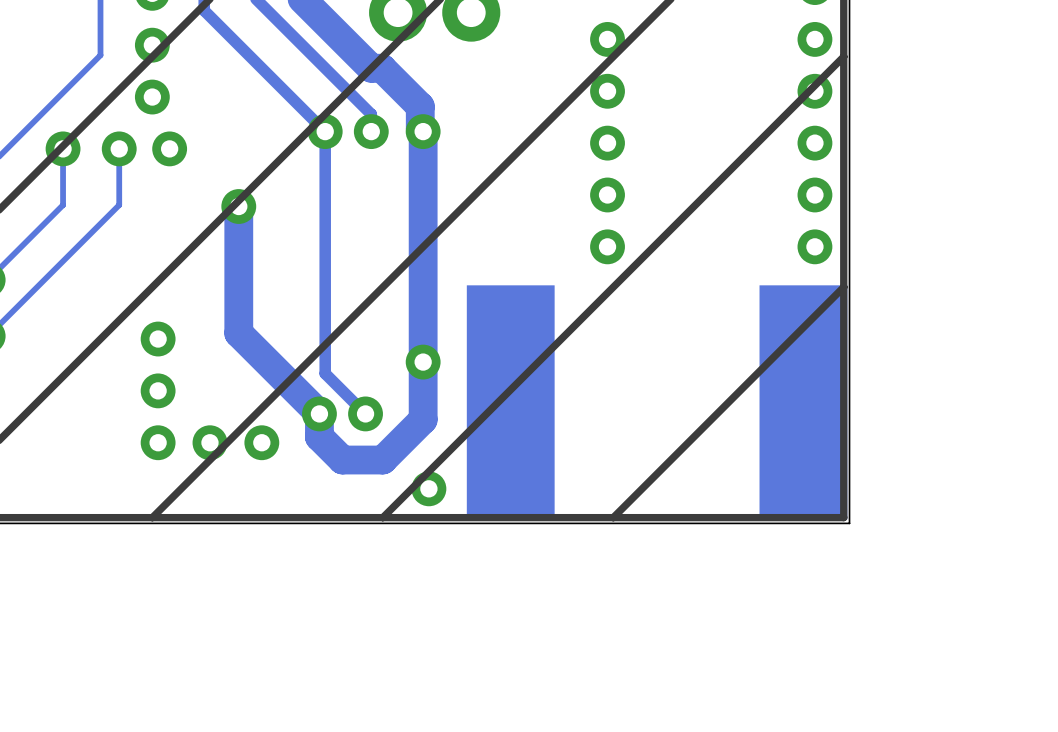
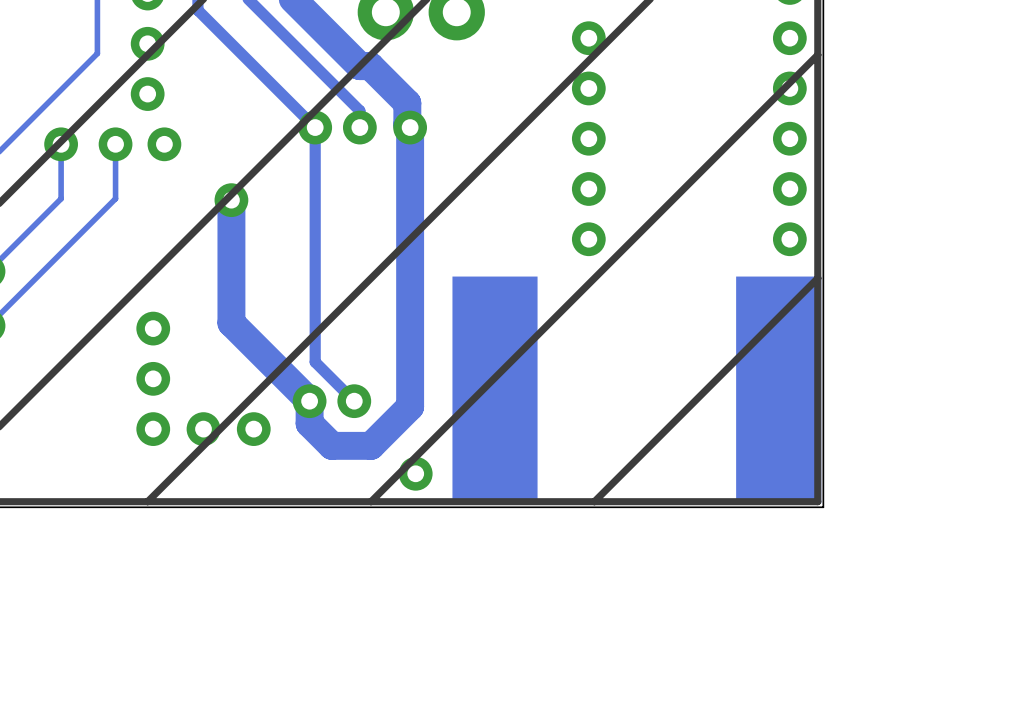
via: (423, 362) -> none

